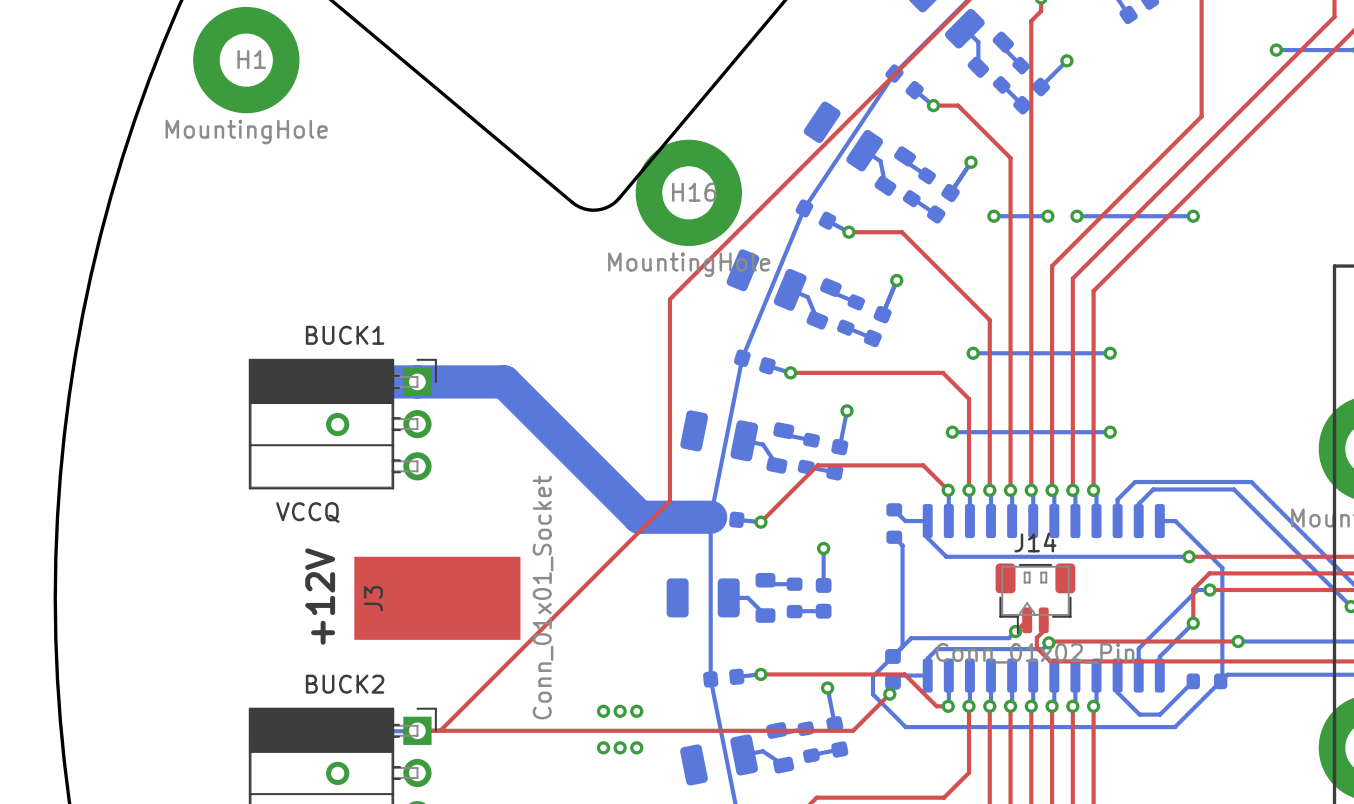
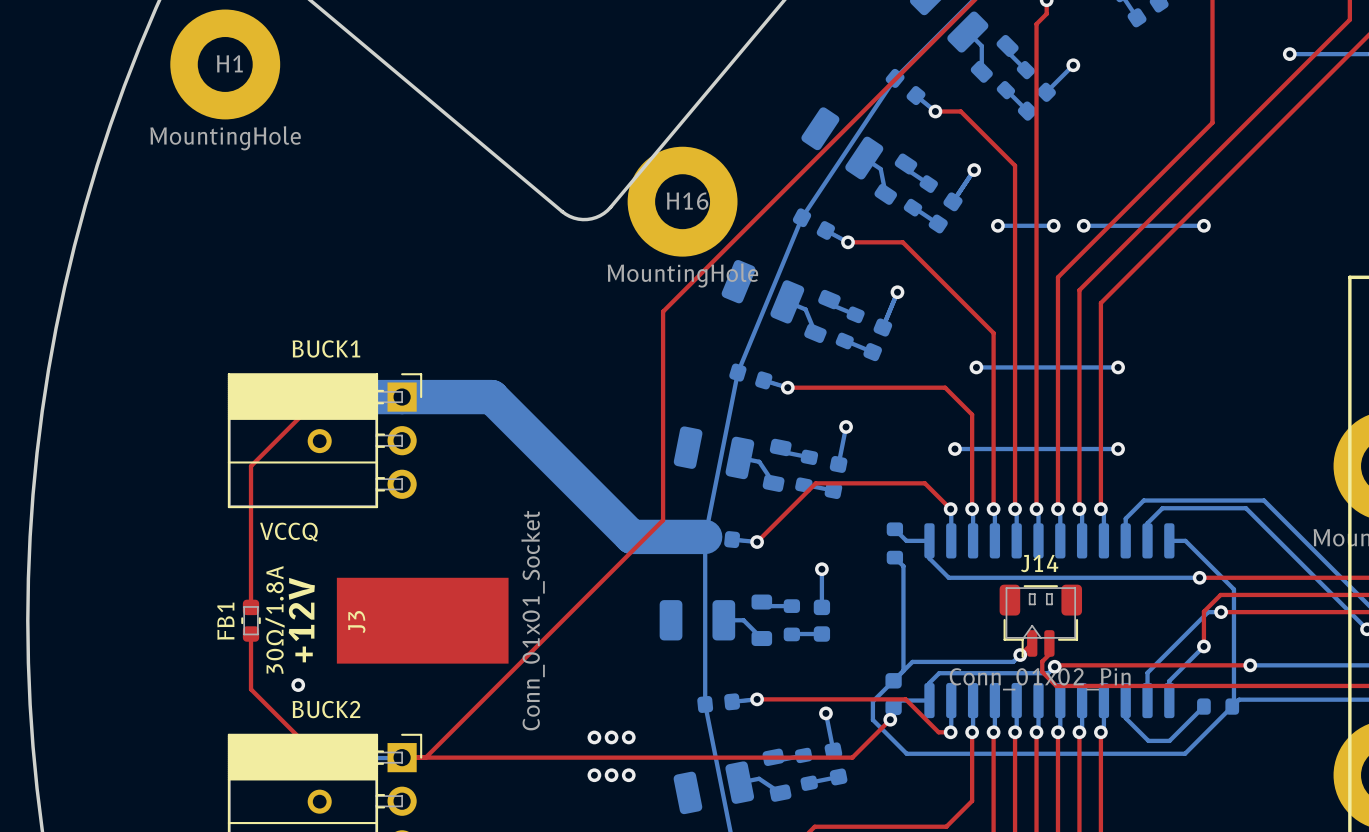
top track: none -> (319, 397) (251, 466) (251, 607)
FB1: none -> 30Ω/1.8A (251, 620)
top track: none -> (251, 634) (251, 689) (319, 758)
via: none -> (298, 685)

